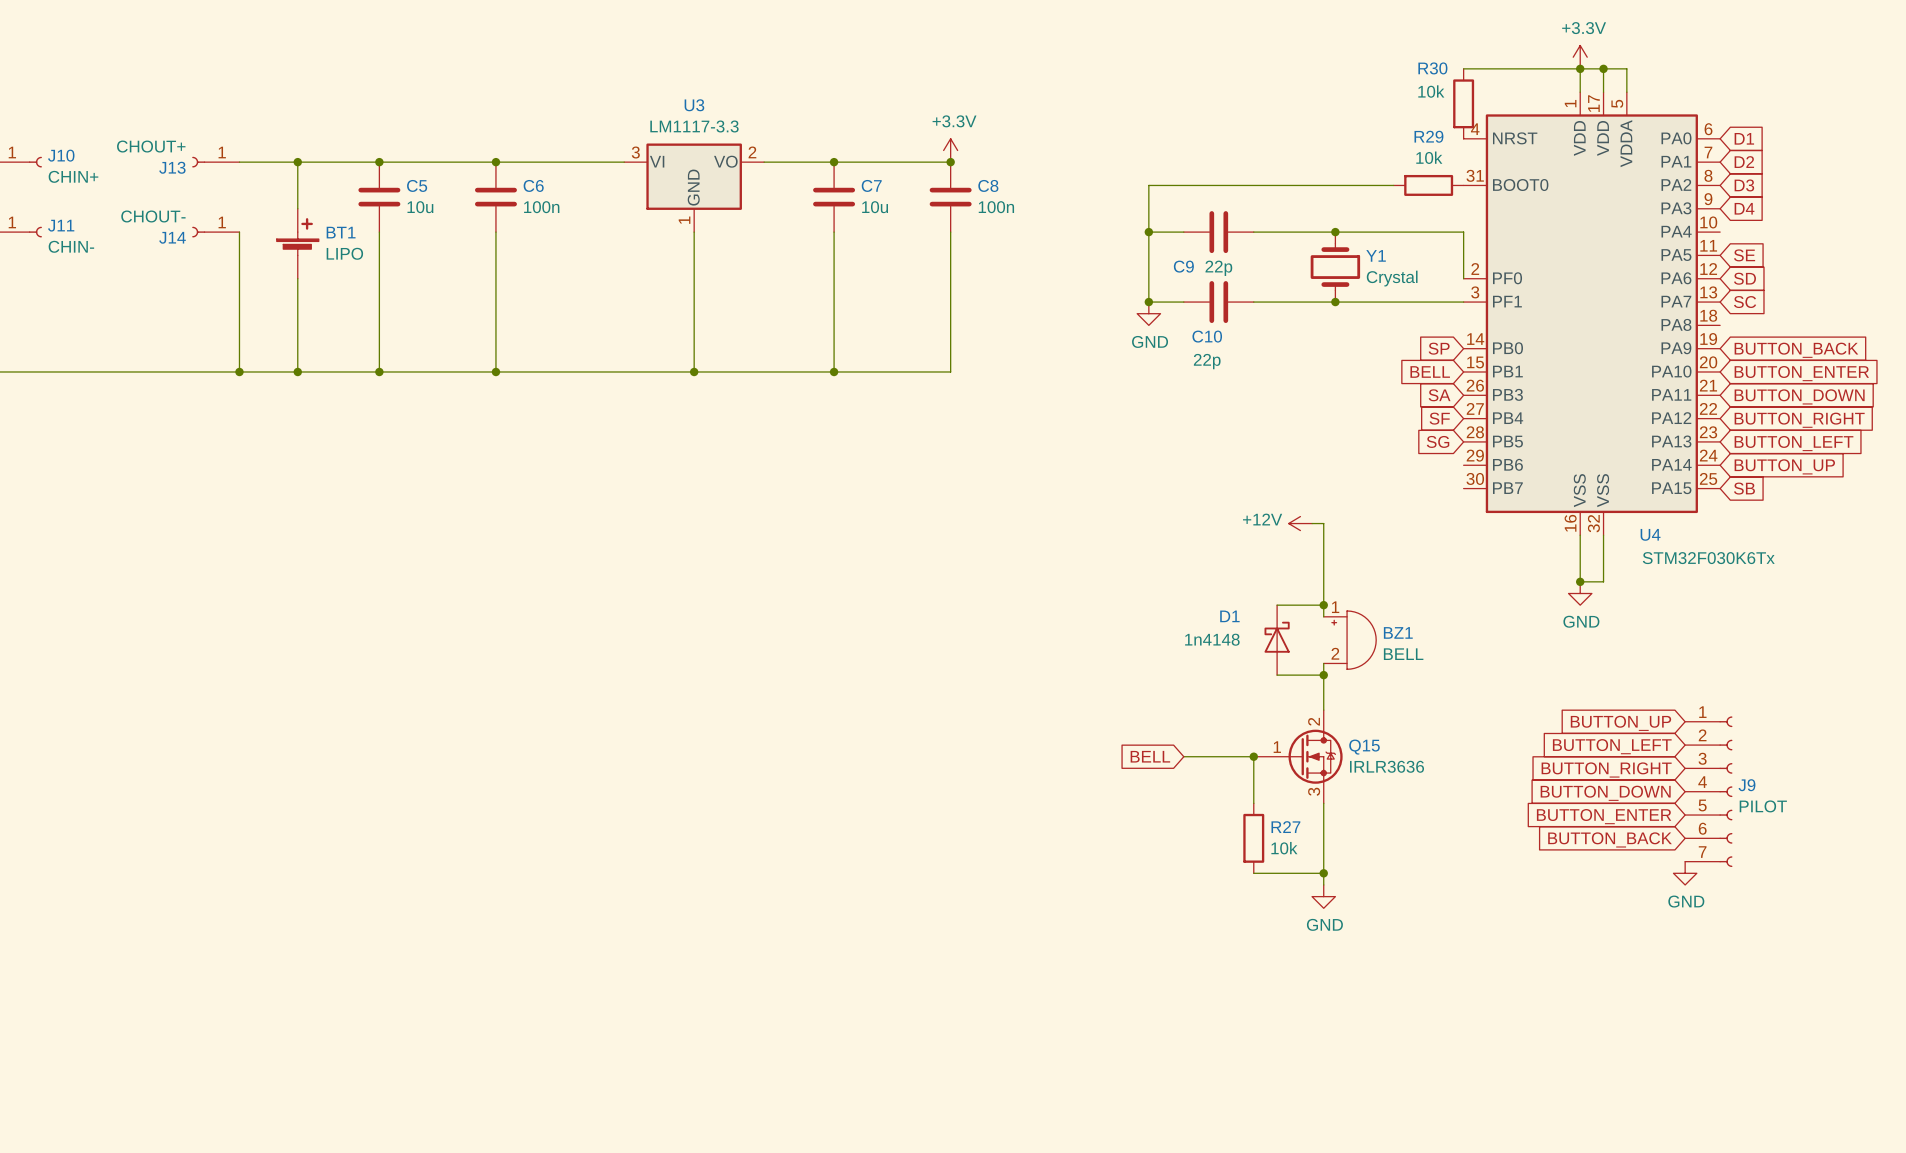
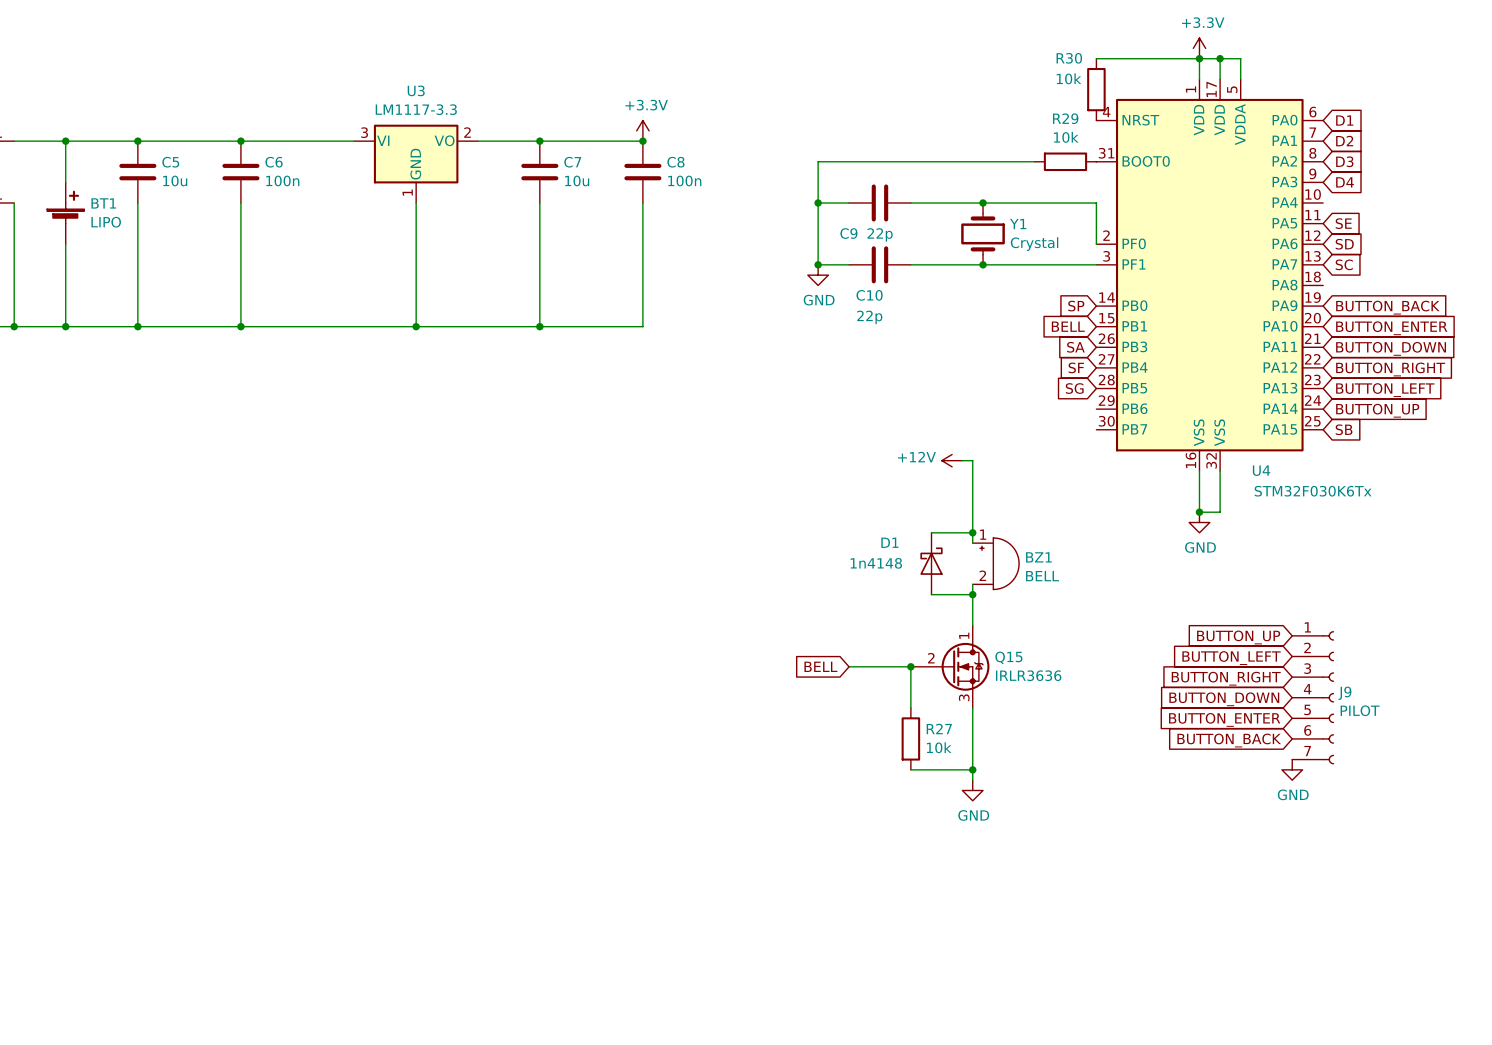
Q15 pin number: 2 (1314, 721) -> 1 (964, 635)
Q15 pin number: 1 (1277, 747) -> 2 (931, 658)

